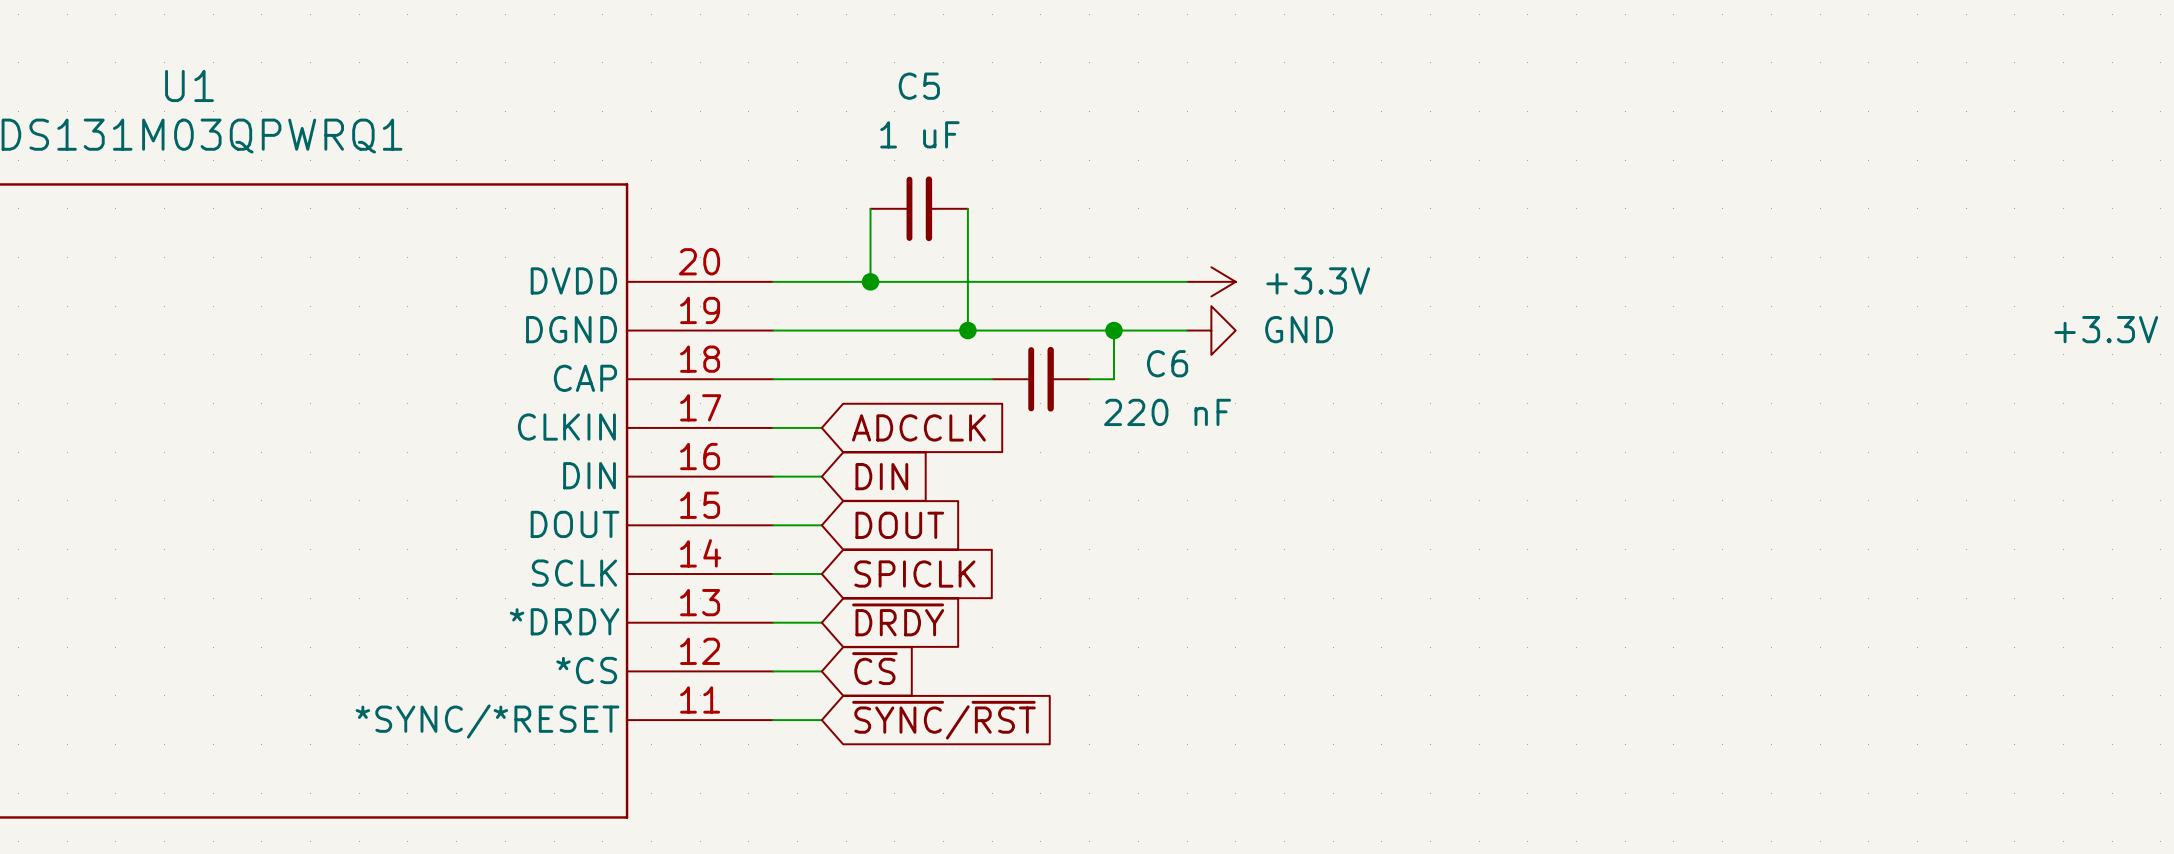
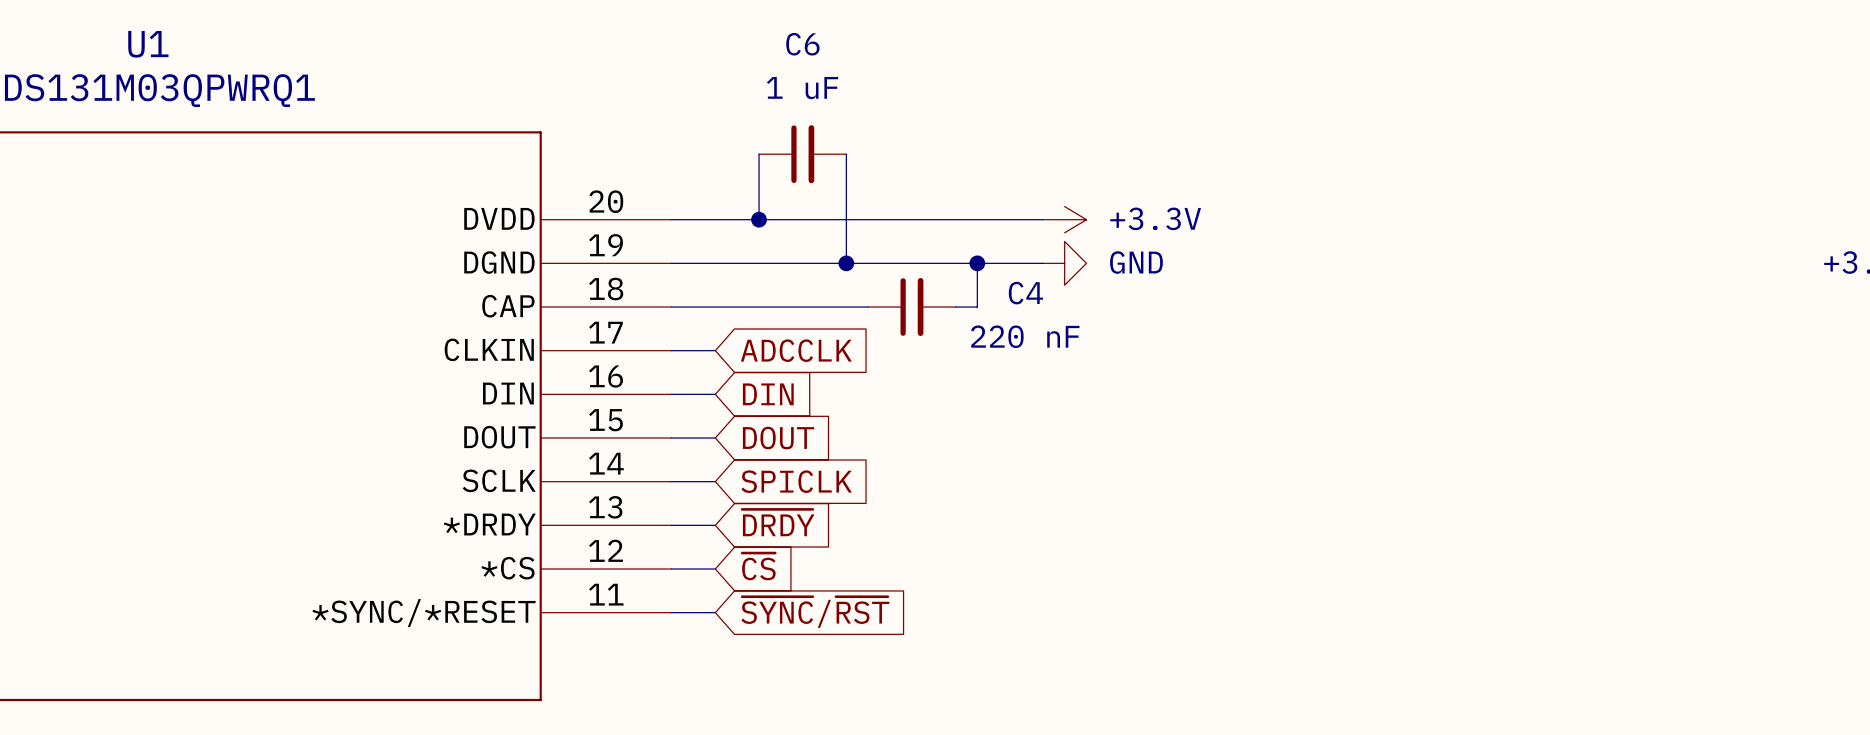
C5 name: C5 (919, 86) -> C6 (802, 44)
C6 name: C6 (1167, 363) -> C4 (1025, 293)

